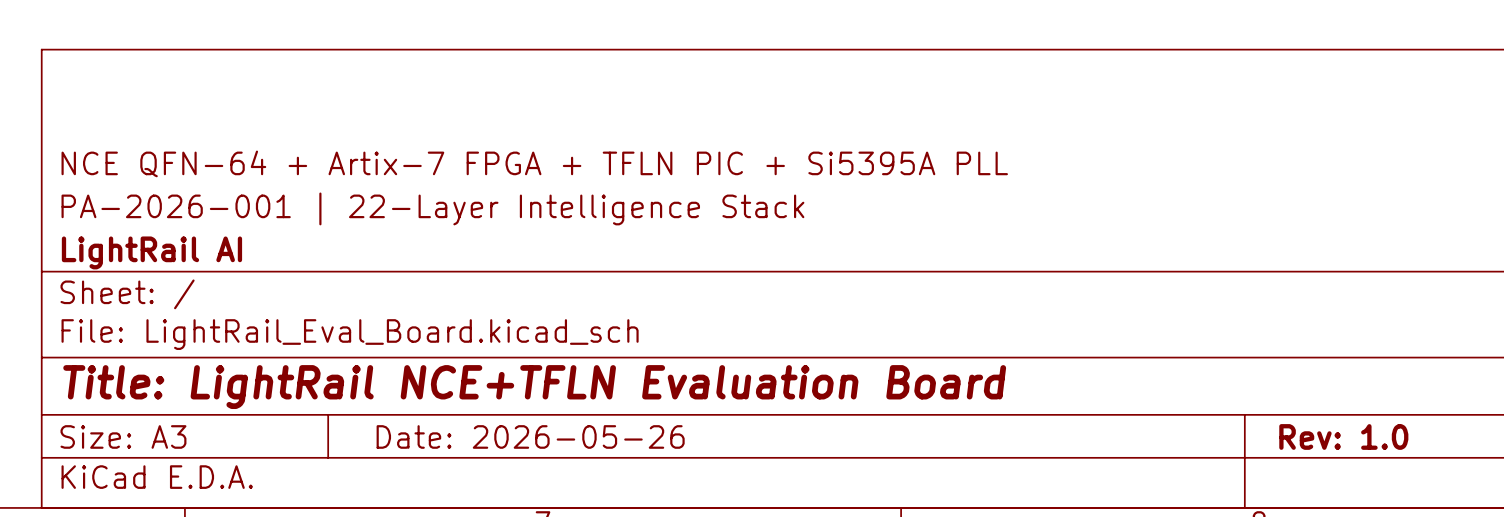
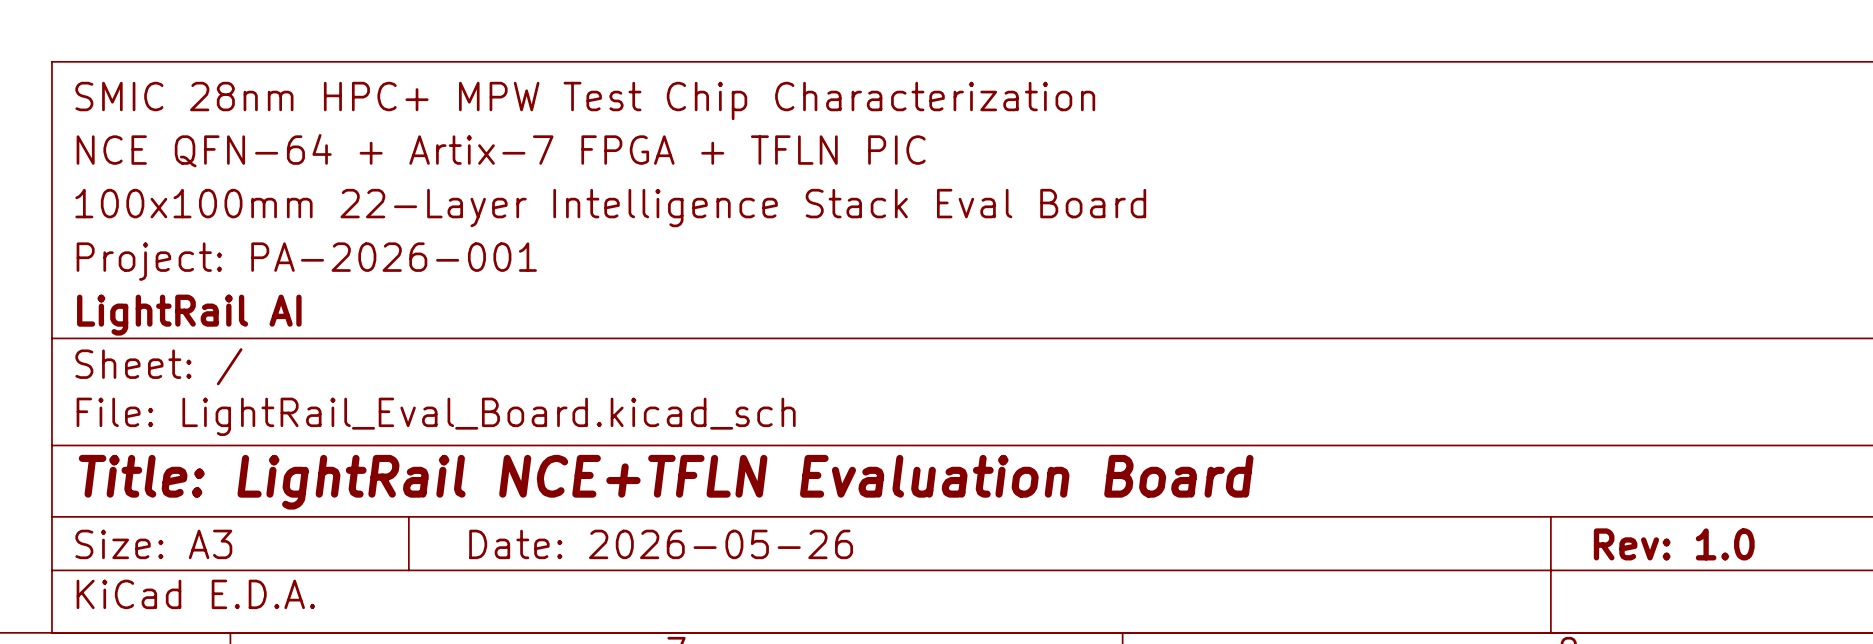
title block: none -> SMIC 28nm HPC+ MPW Test Chip Characterization (585, 100)
title block: none -> NCE QFN-64 + Artix-7 FPGA + TFLN PIC (501, 150)
title block: NCE QFN-64 + Artix-7 FPGA + TFLN PIC + Si5395A PLL (534, 163) -> 100x100mm 22-Layer Intelligence Stack Eval Board (610, 208)
title block: PA-2026-001 | 22-Layer Intelligence Stack (432, 208) -> Project: PA-2026-001 (306, 261)

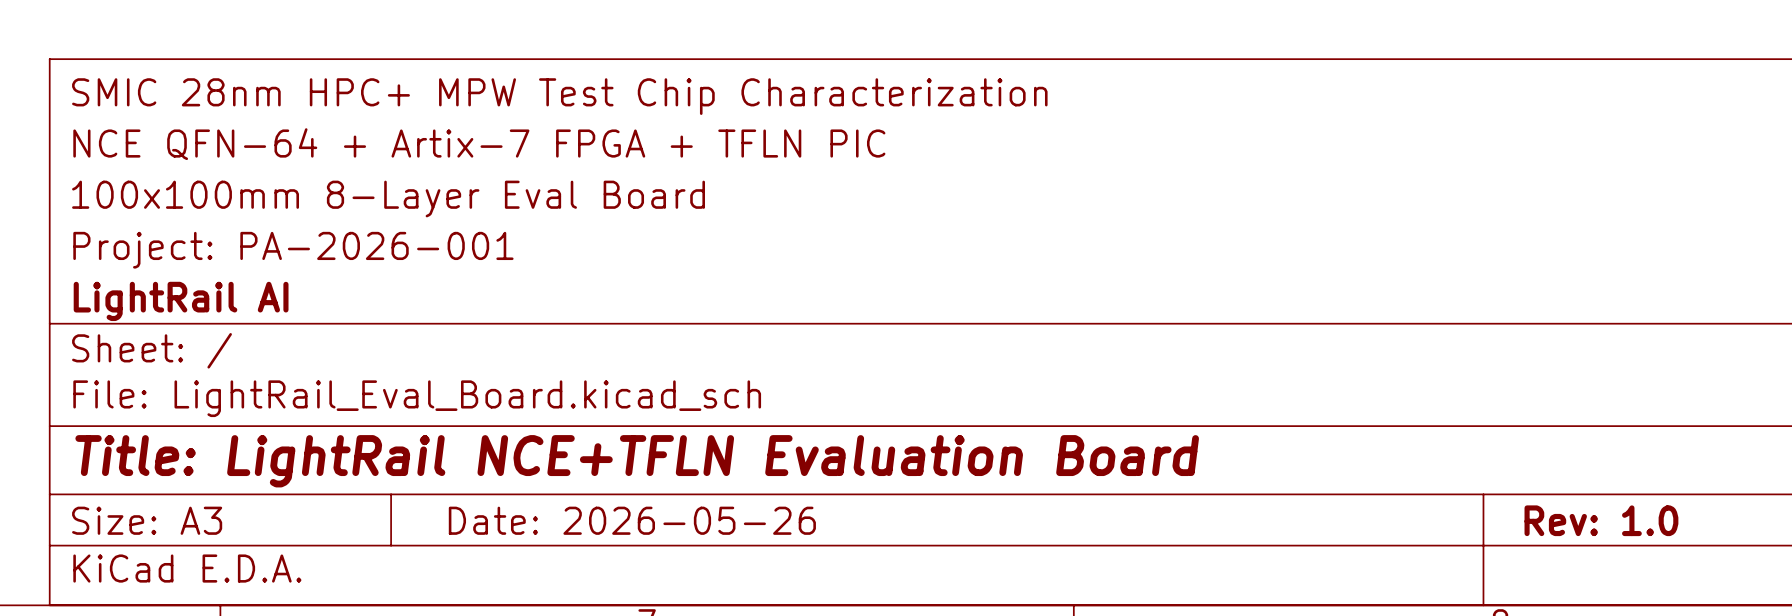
title block: 100x100mm 22-Layer Intelligence Stack Eval Board (610, 208) -> 100x100mm 8-Layer Eval Board (388, 199)

